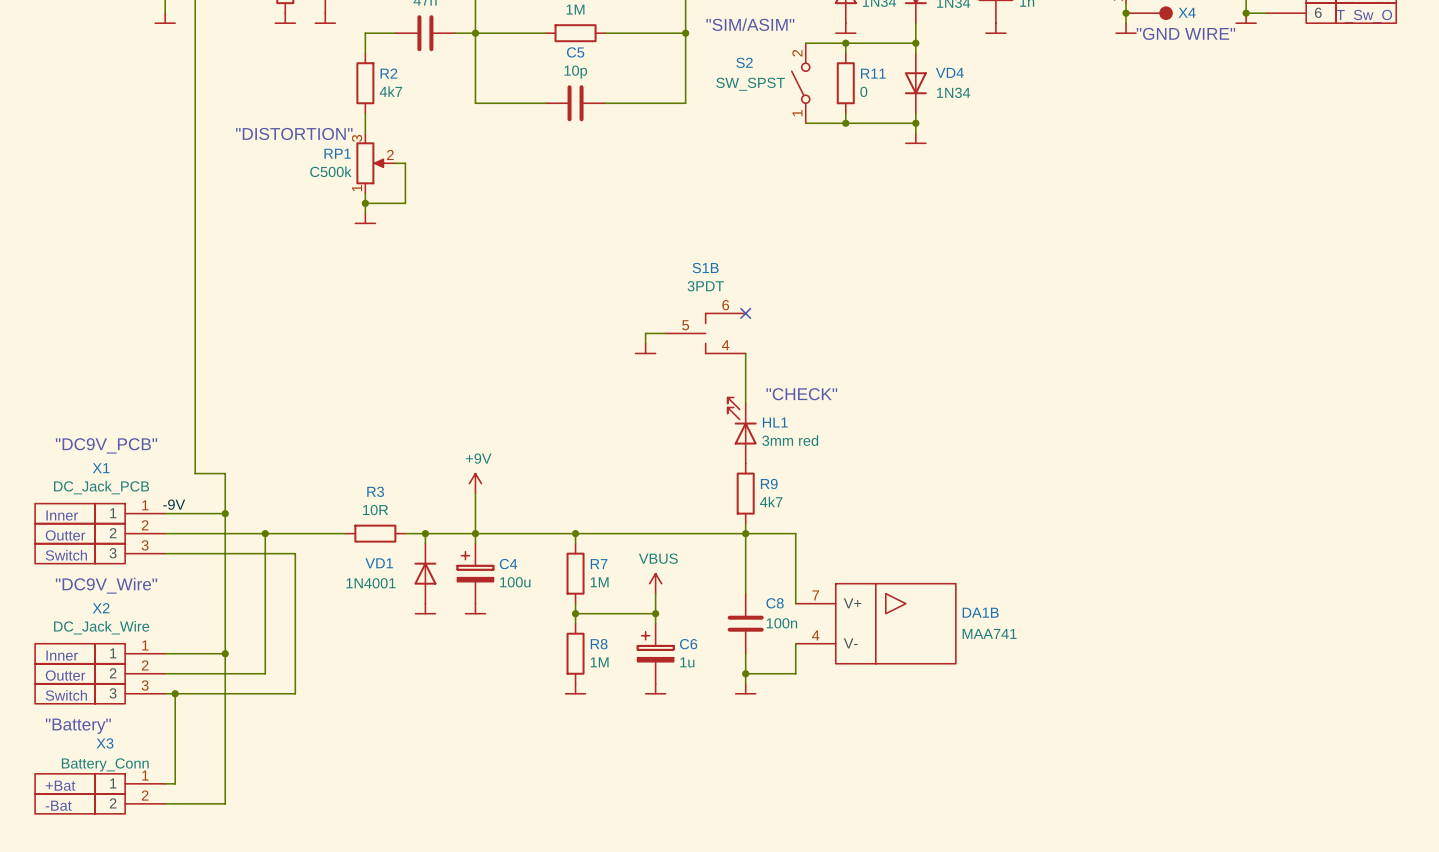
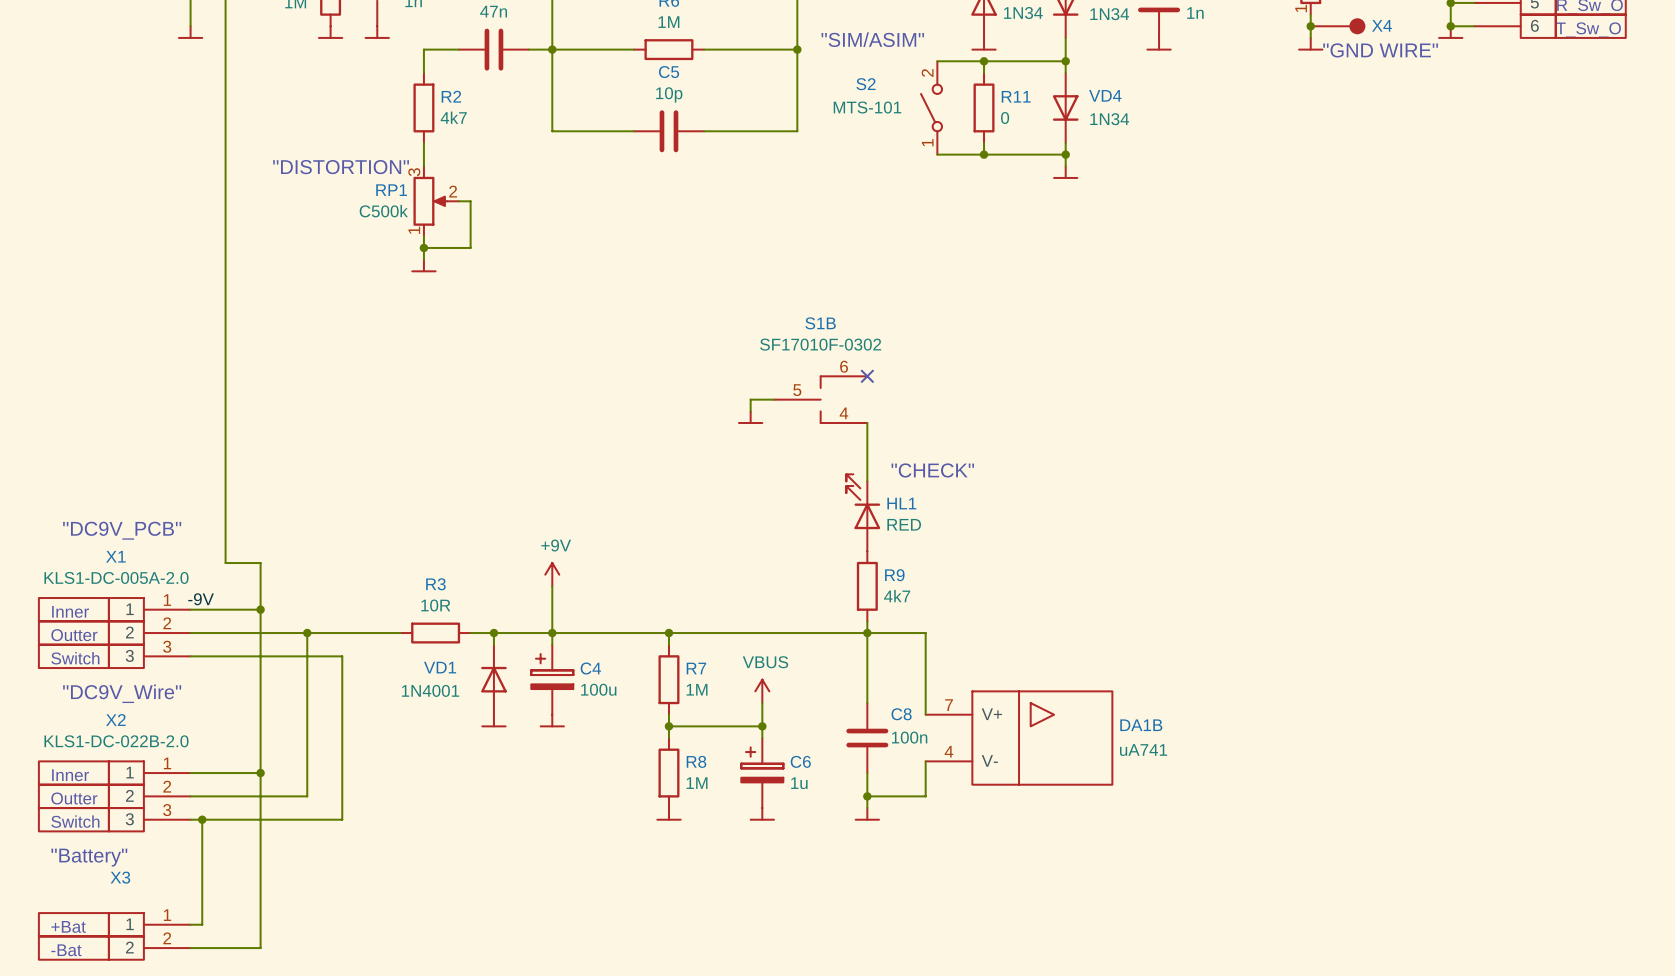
S2 value: SW_SPST (750, 84) -> MTS-101 (867, 107)
S1B value: 3PDT (705, 286) -> SF17010F-0302 (820, 344)
HL1 value: 3mm red (790, 440) -> RED (904, 524)
X1 value: DC_Jack_PCB (101, 487) -> KLS1-DC-005A-2.0 (116, 577)
X2 value: DC_Jack_Wire (101, 627) -> KLS1-DC-022B-2.0 (116, 741)
DA1B value: MAA741 (989, 633) -> uA741 (1143, 750)
X3 value: Battery_Conn (105, 764) -> none

